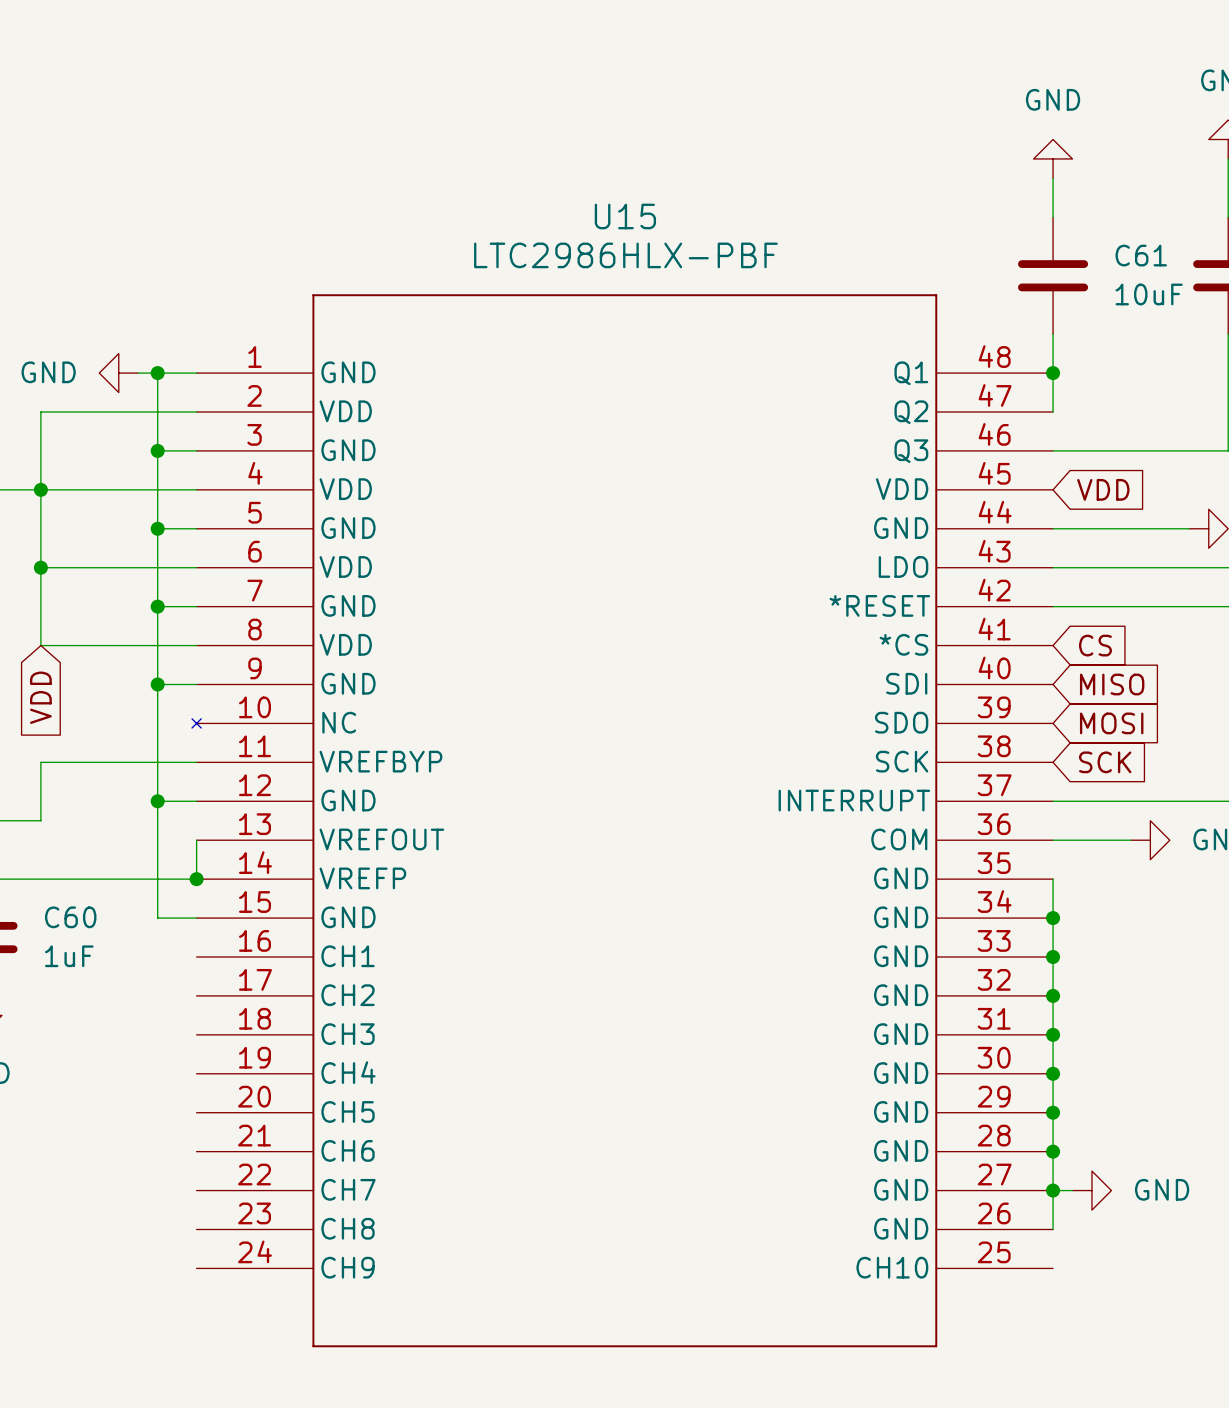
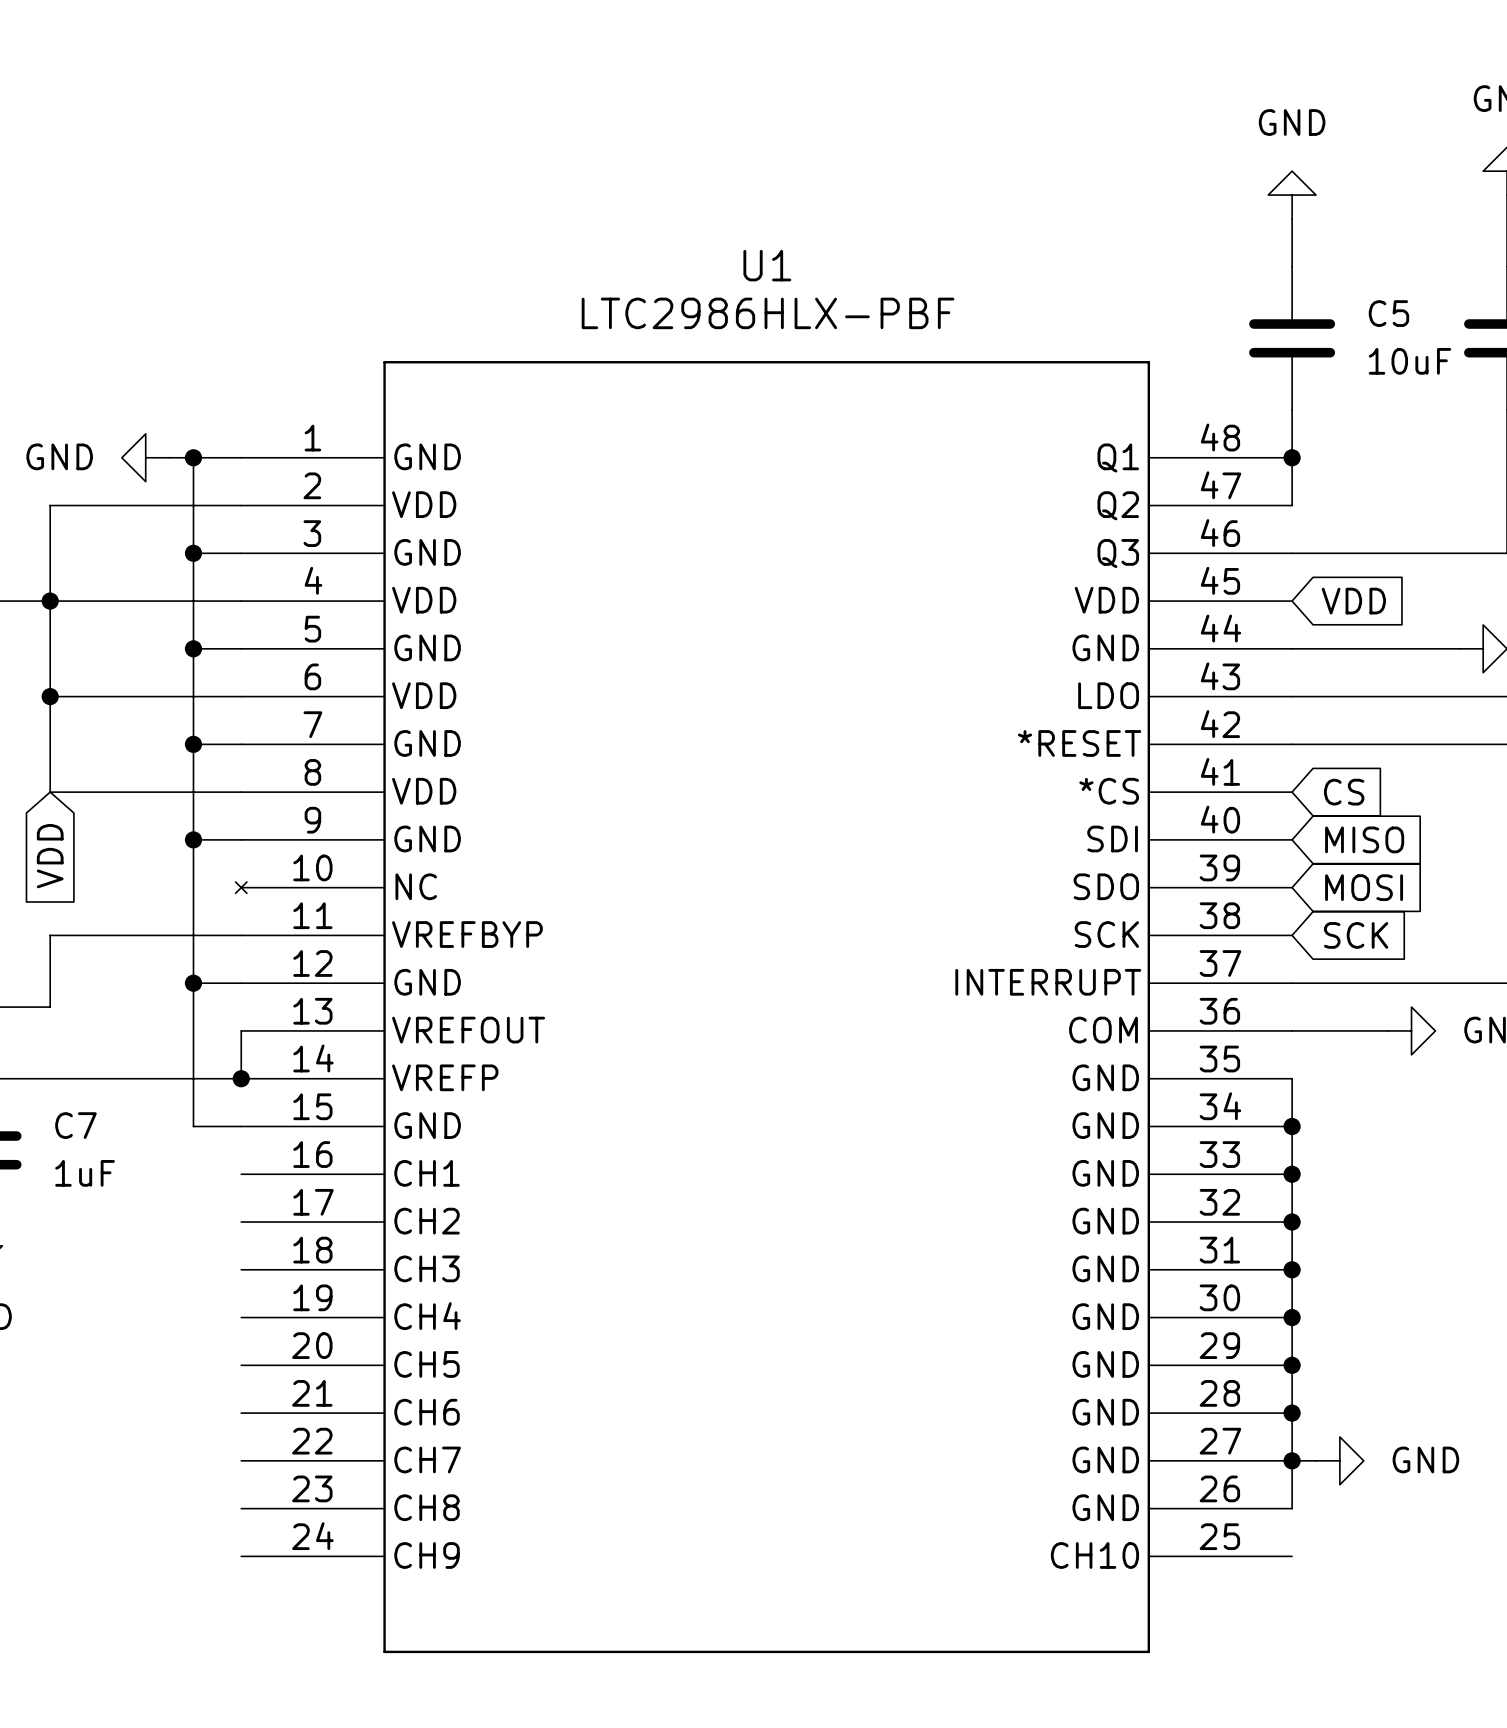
U15 name: U15 (625, 216) -> U1 (767, 265)
C61 name: C61 (1141, 255) -> C5 (1388, 313)
C60 name: C60 (70, 917) -> C7 (75, 1125)

